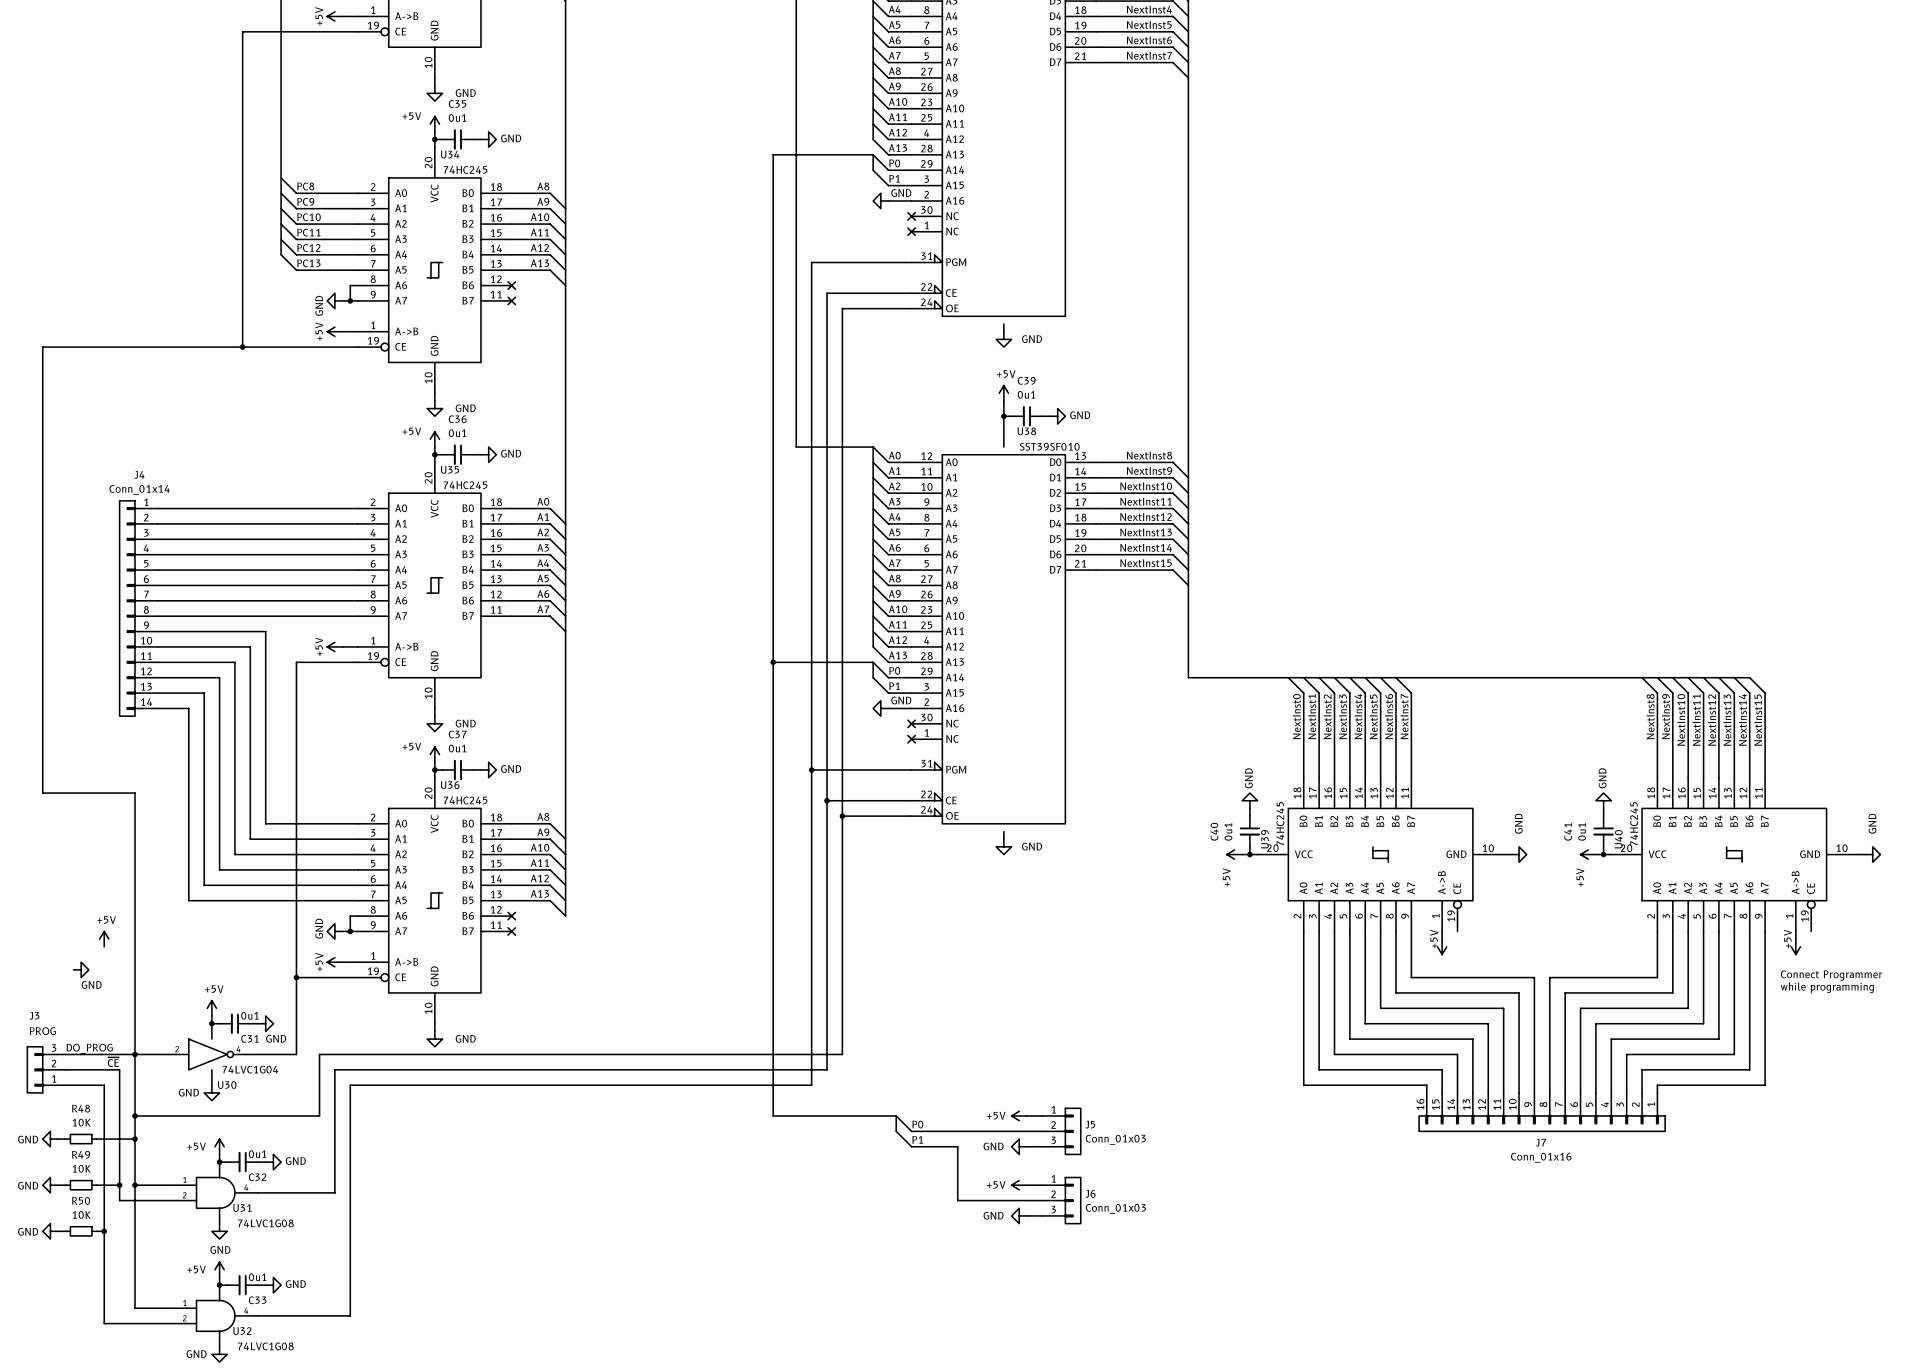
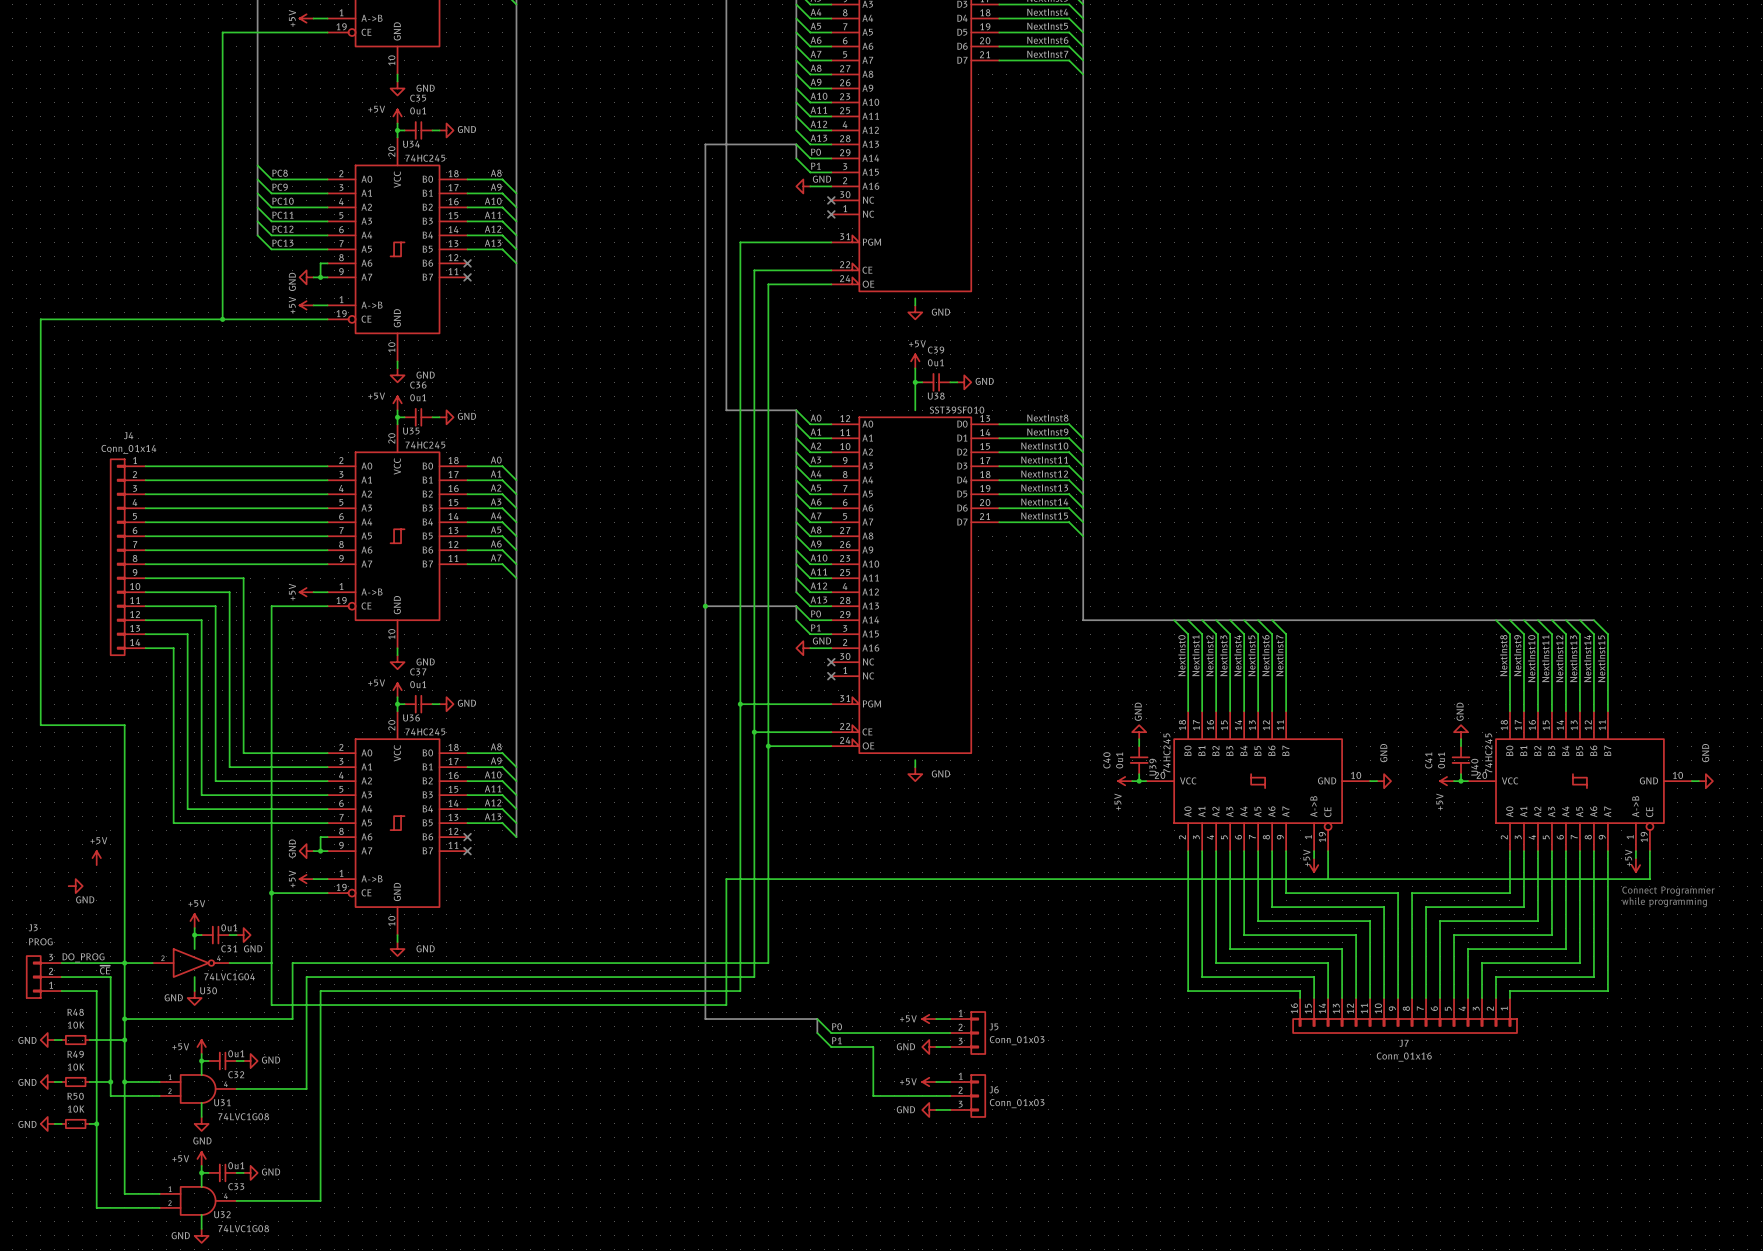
wire: none -> (1328, 851) (1328, 879)
wire: none -> (1649, 851) (1649, 879) (726, 879) (726, 1005) (271, 1005) (271, 963)

